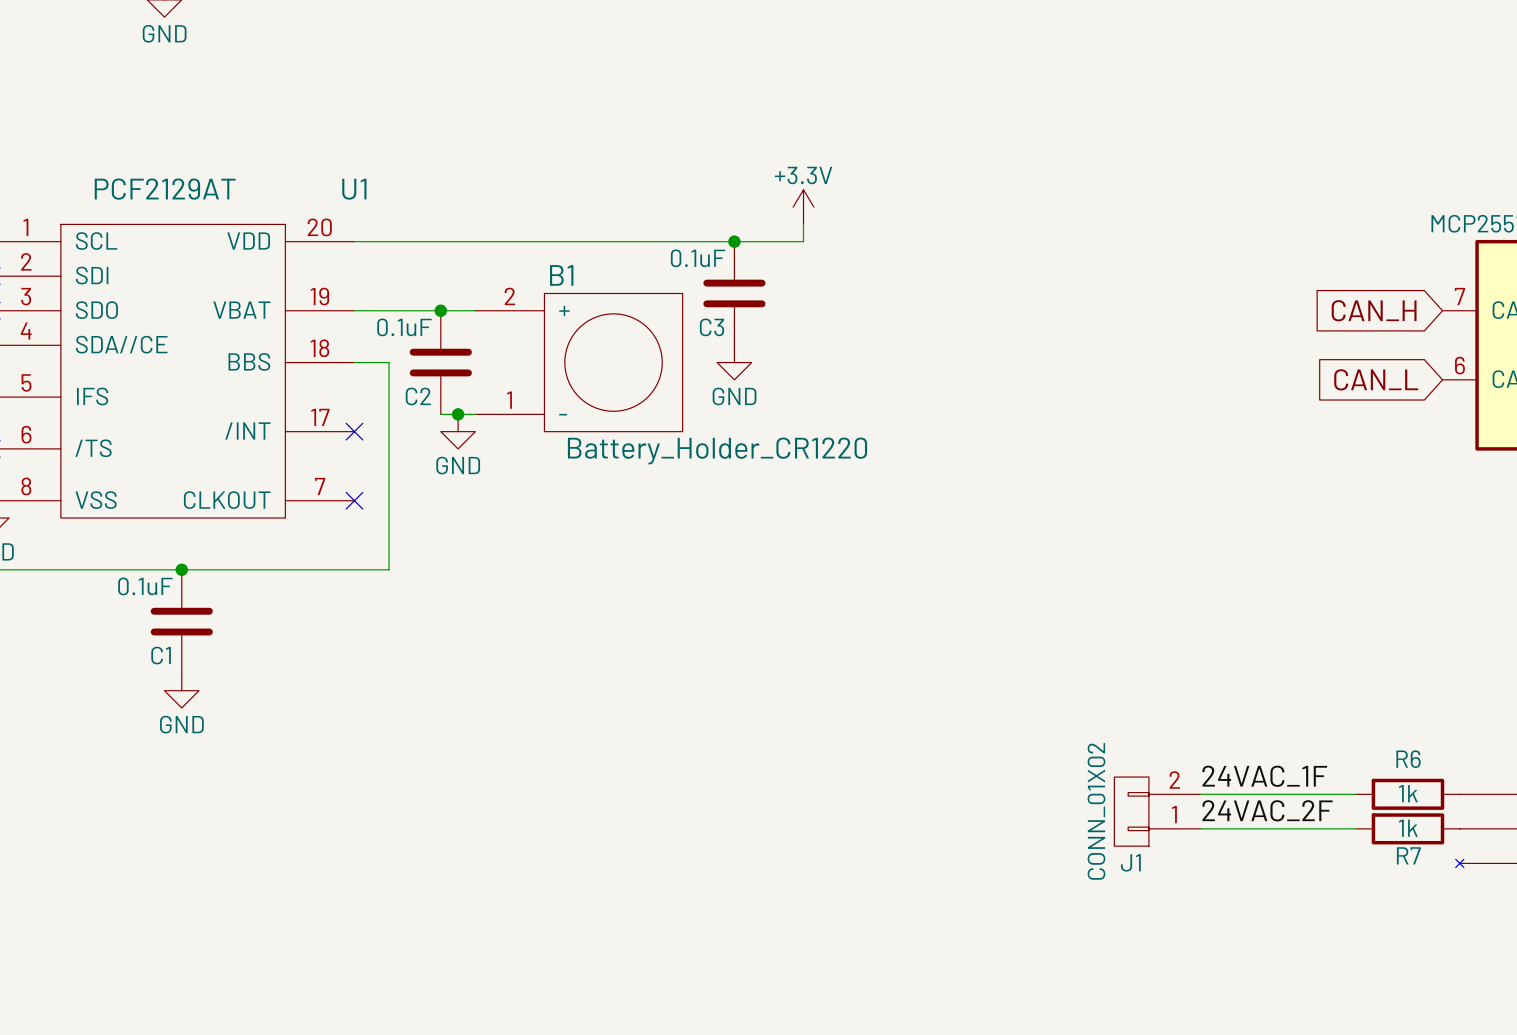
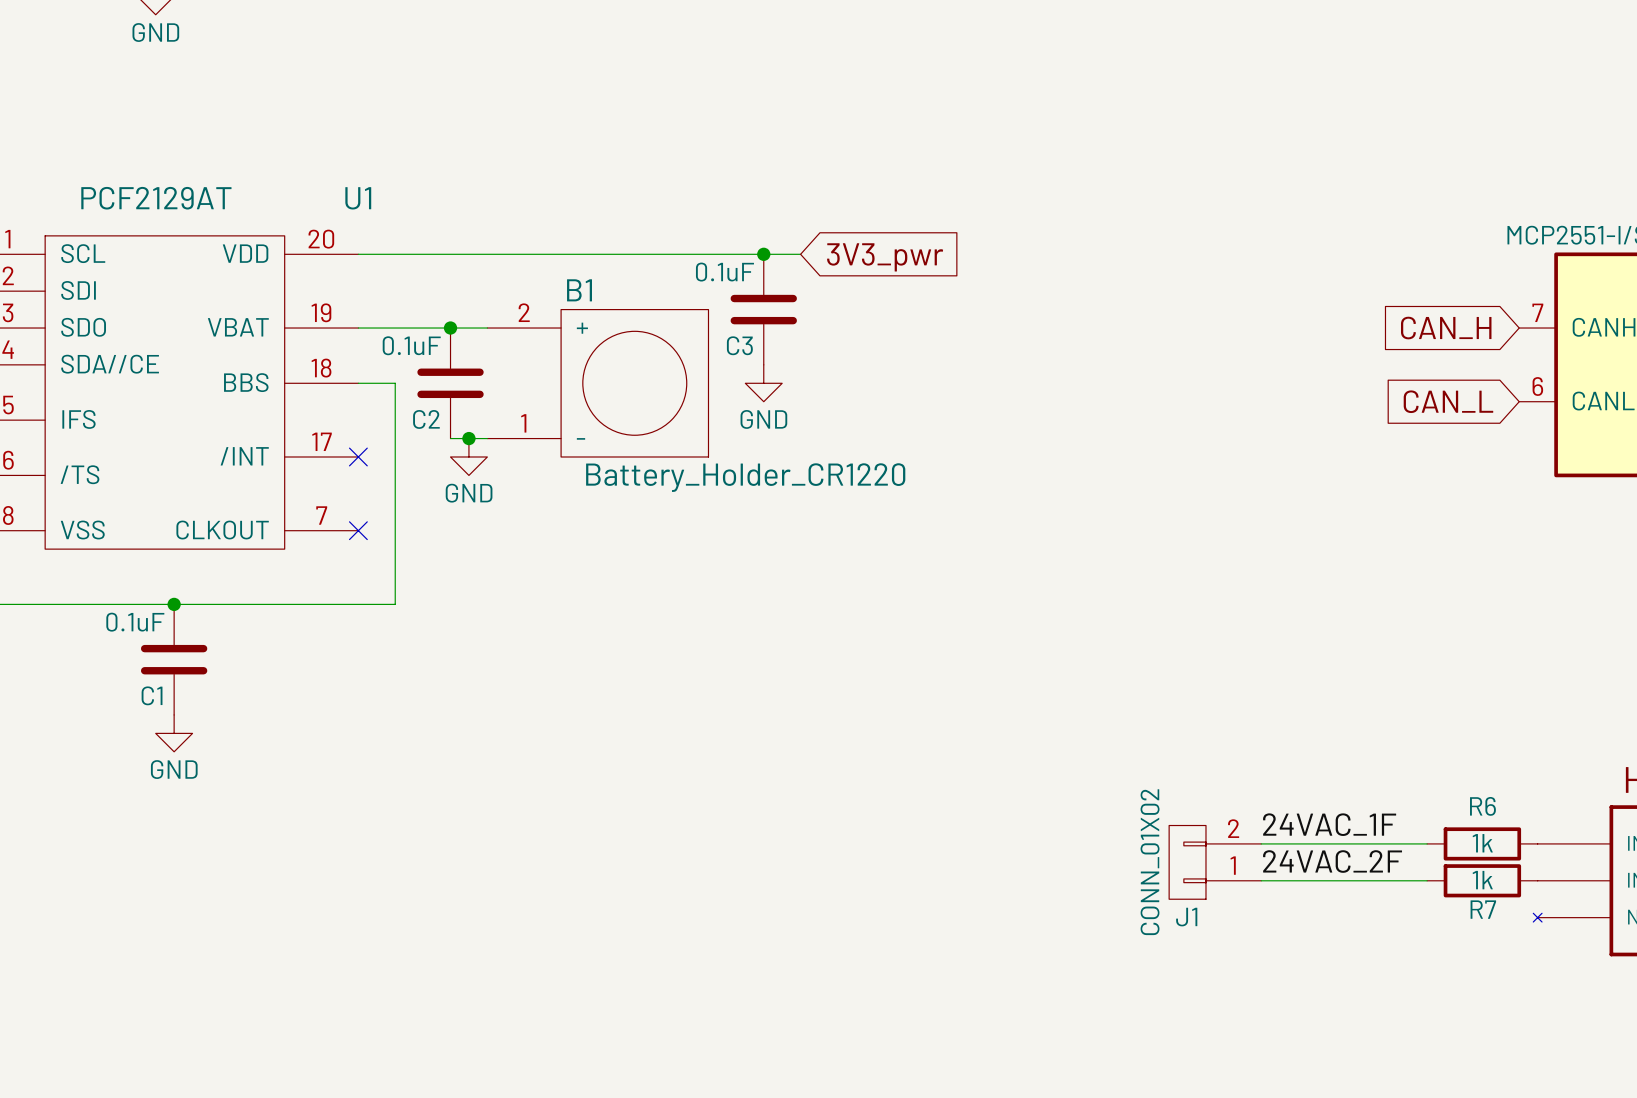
power symbol: +3.3V (803, 207) -> none
wire: (803, 224) (803, 241) (768, 241) -> none
global label: none -> 3V3_pwr (885, 257)

